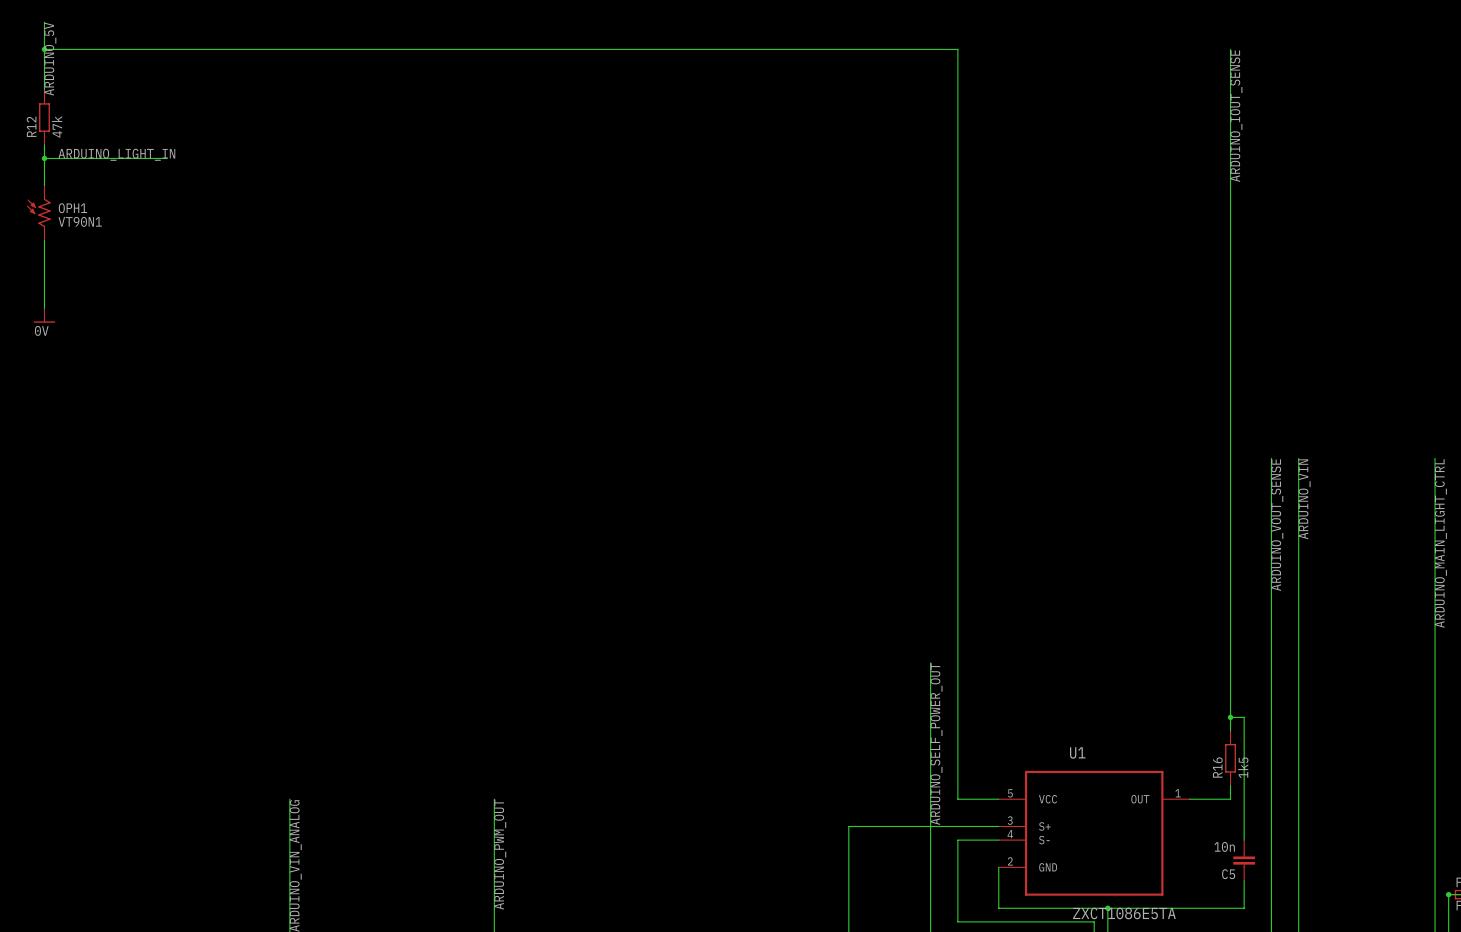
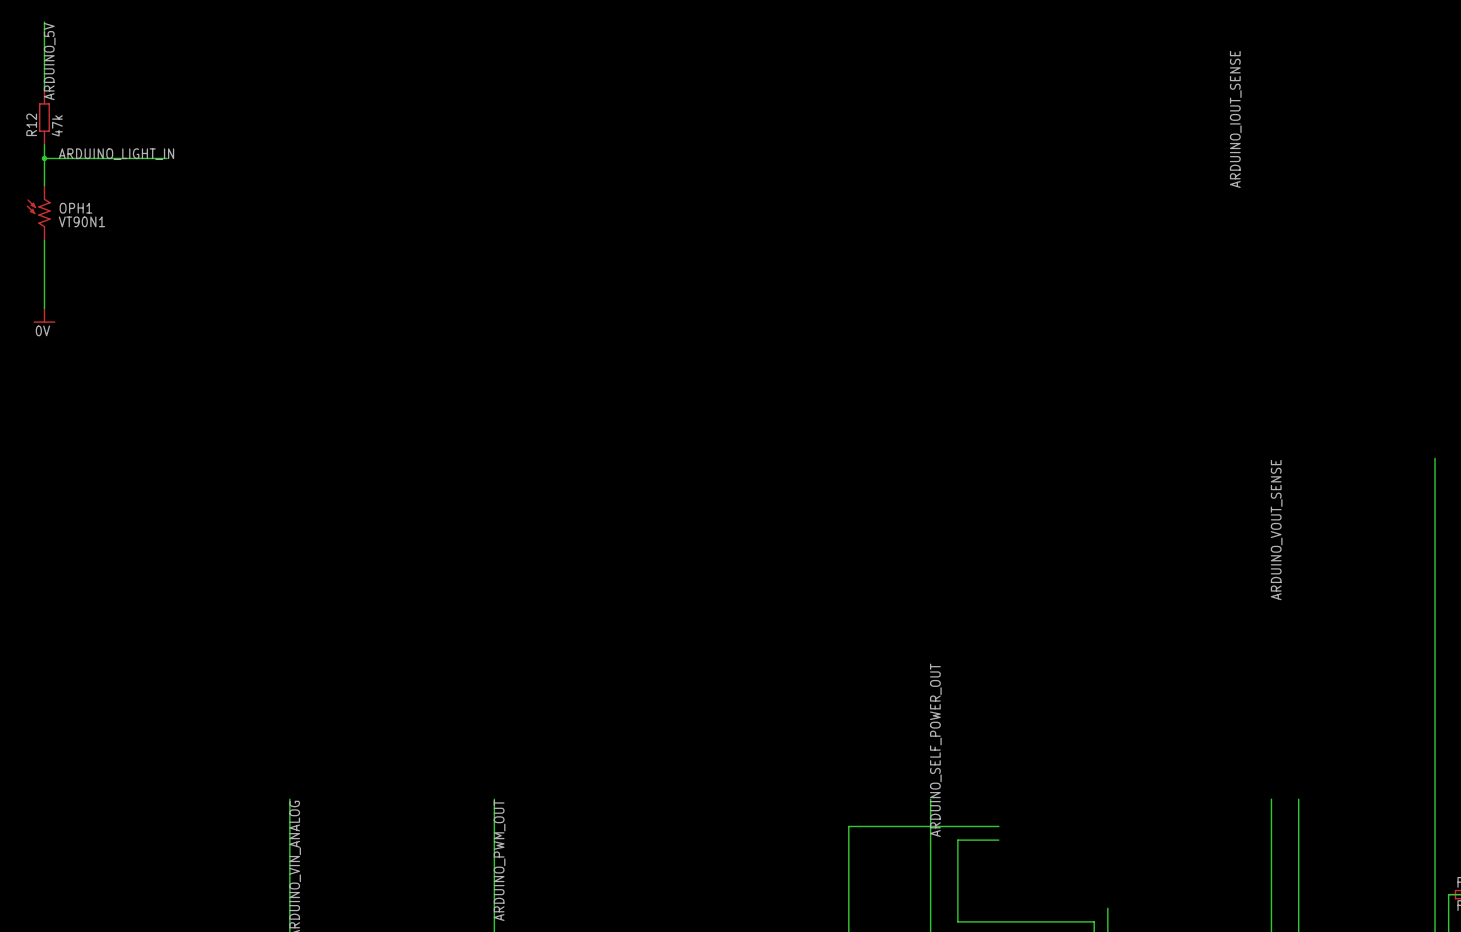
wire: (44, 49) (957, 49) (957, 799) (998, 799) -> none
junction: (44, 49) -> none
wire: (1230, 49) (1230, 731) -> none
wire: (1271, 458) (1271, 799) -> none
wire: (1298, 458) (1298, 799) -> none
label: ARDUINO_VIN (1304, 499) -> none
label: ARDUINO_MAIN_LIGHT_CTRL (1440, 543) -> none
wire: (930, 662) (930, 799) -> none
wire: (1230, 717) (1244, 717) (1244, 840) -> none
junction: (1230, 717) -> none
R16: 1k5 (1230, 758) -> none
wire: (1230, 785) (1230, 799) (1189, 799) -> none
U1: ZXCT1086E5TA (1094, 833) -> none
C5: 10n (1244, 860) -> none
wire: (998, 867) (998, 908) (1244, 908) (1244, 881) -> none
junction: (1448, 894) -> none
junction: (1107, 908) -> none

